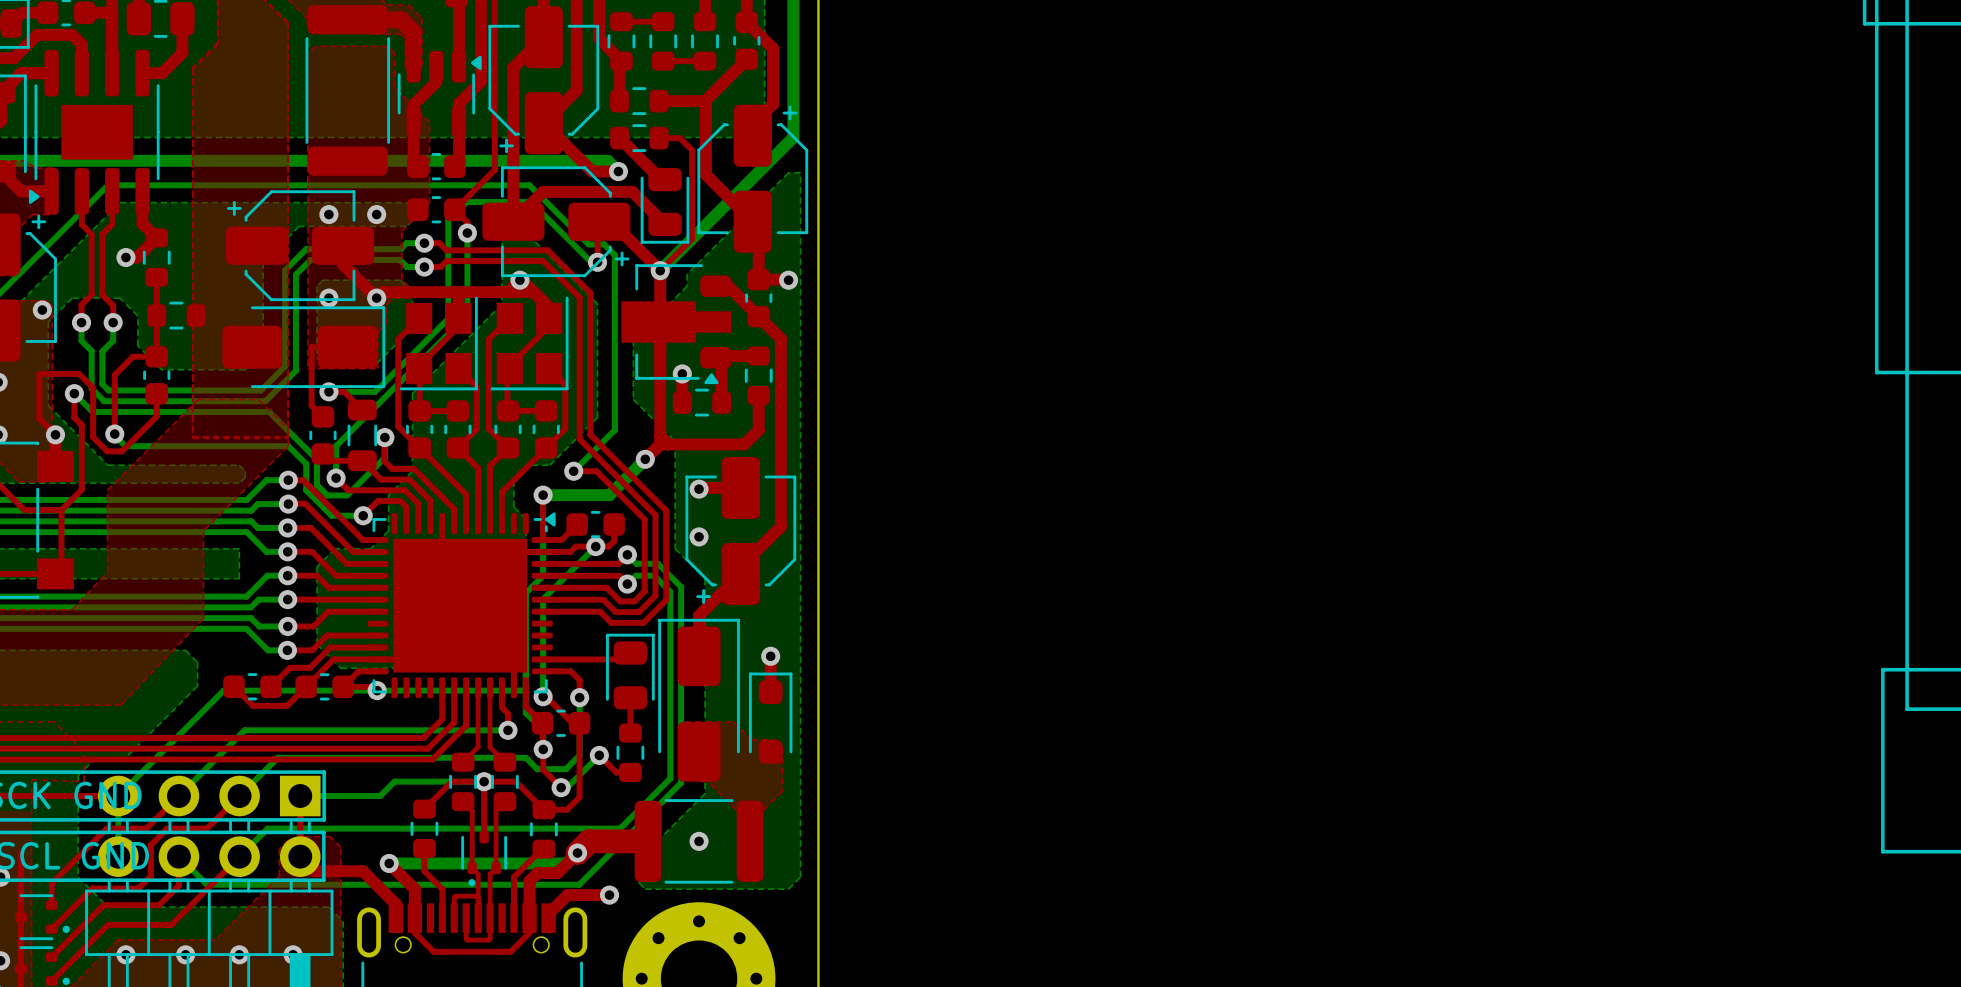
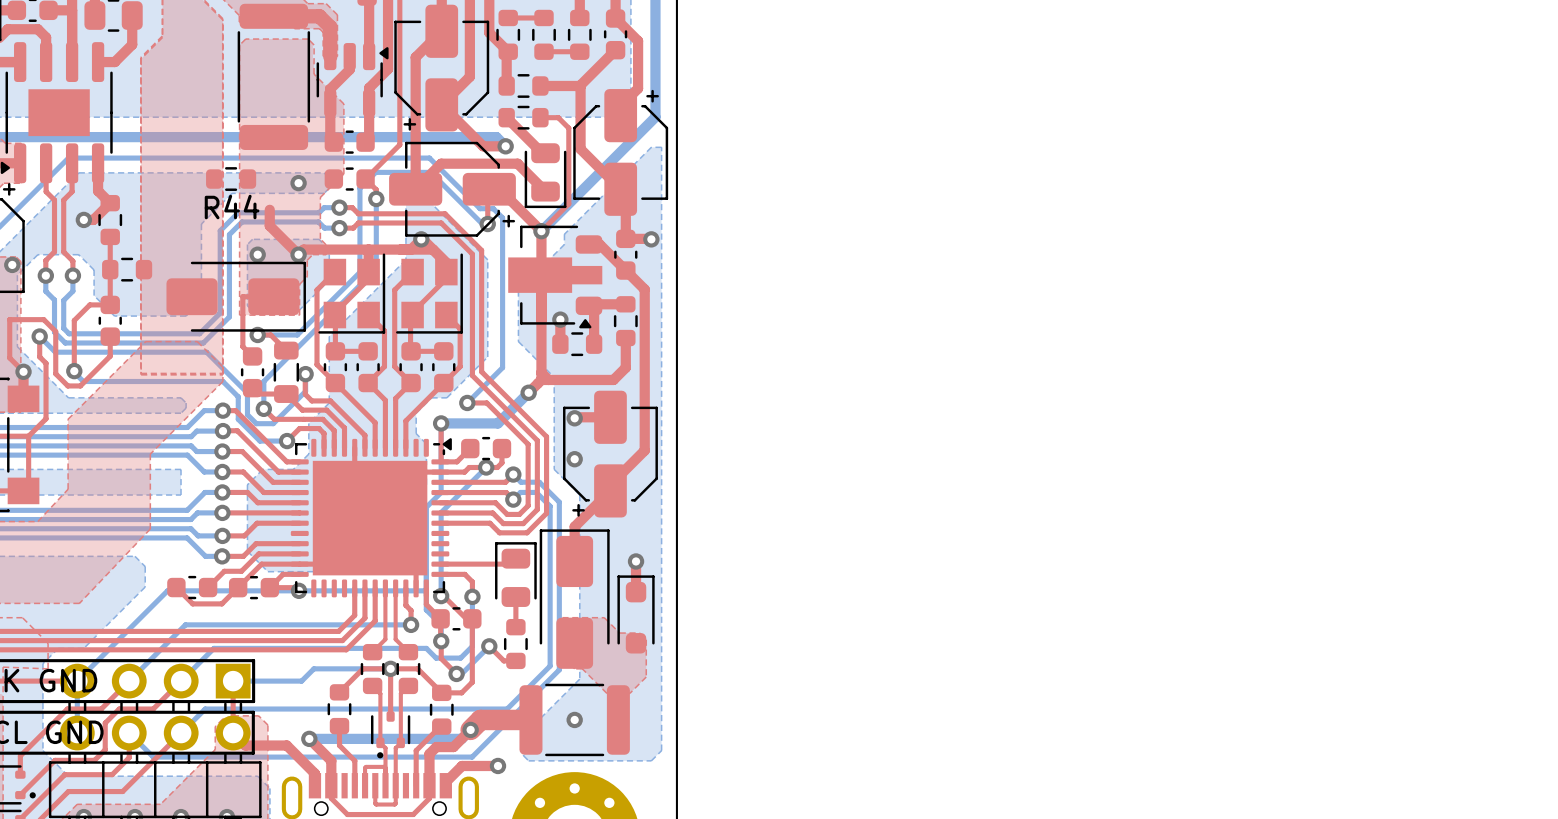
R44: none -> (231, 179)
via: (328, 214) -> none
part: (300, 245) -> none

